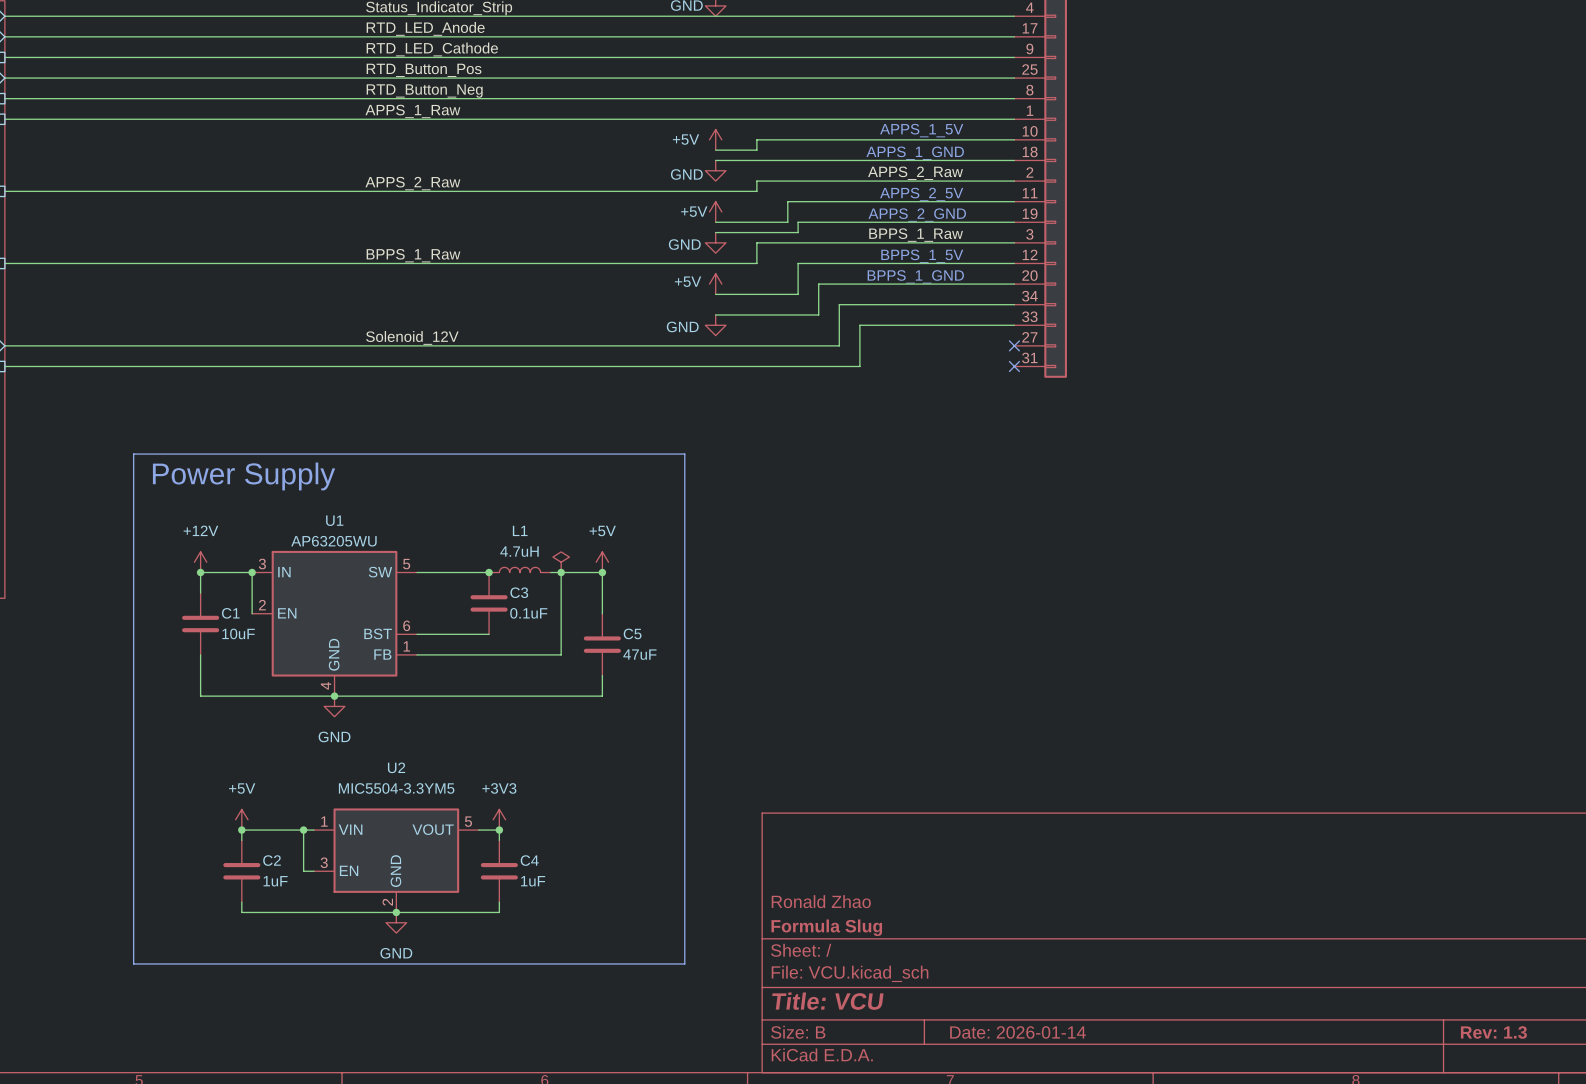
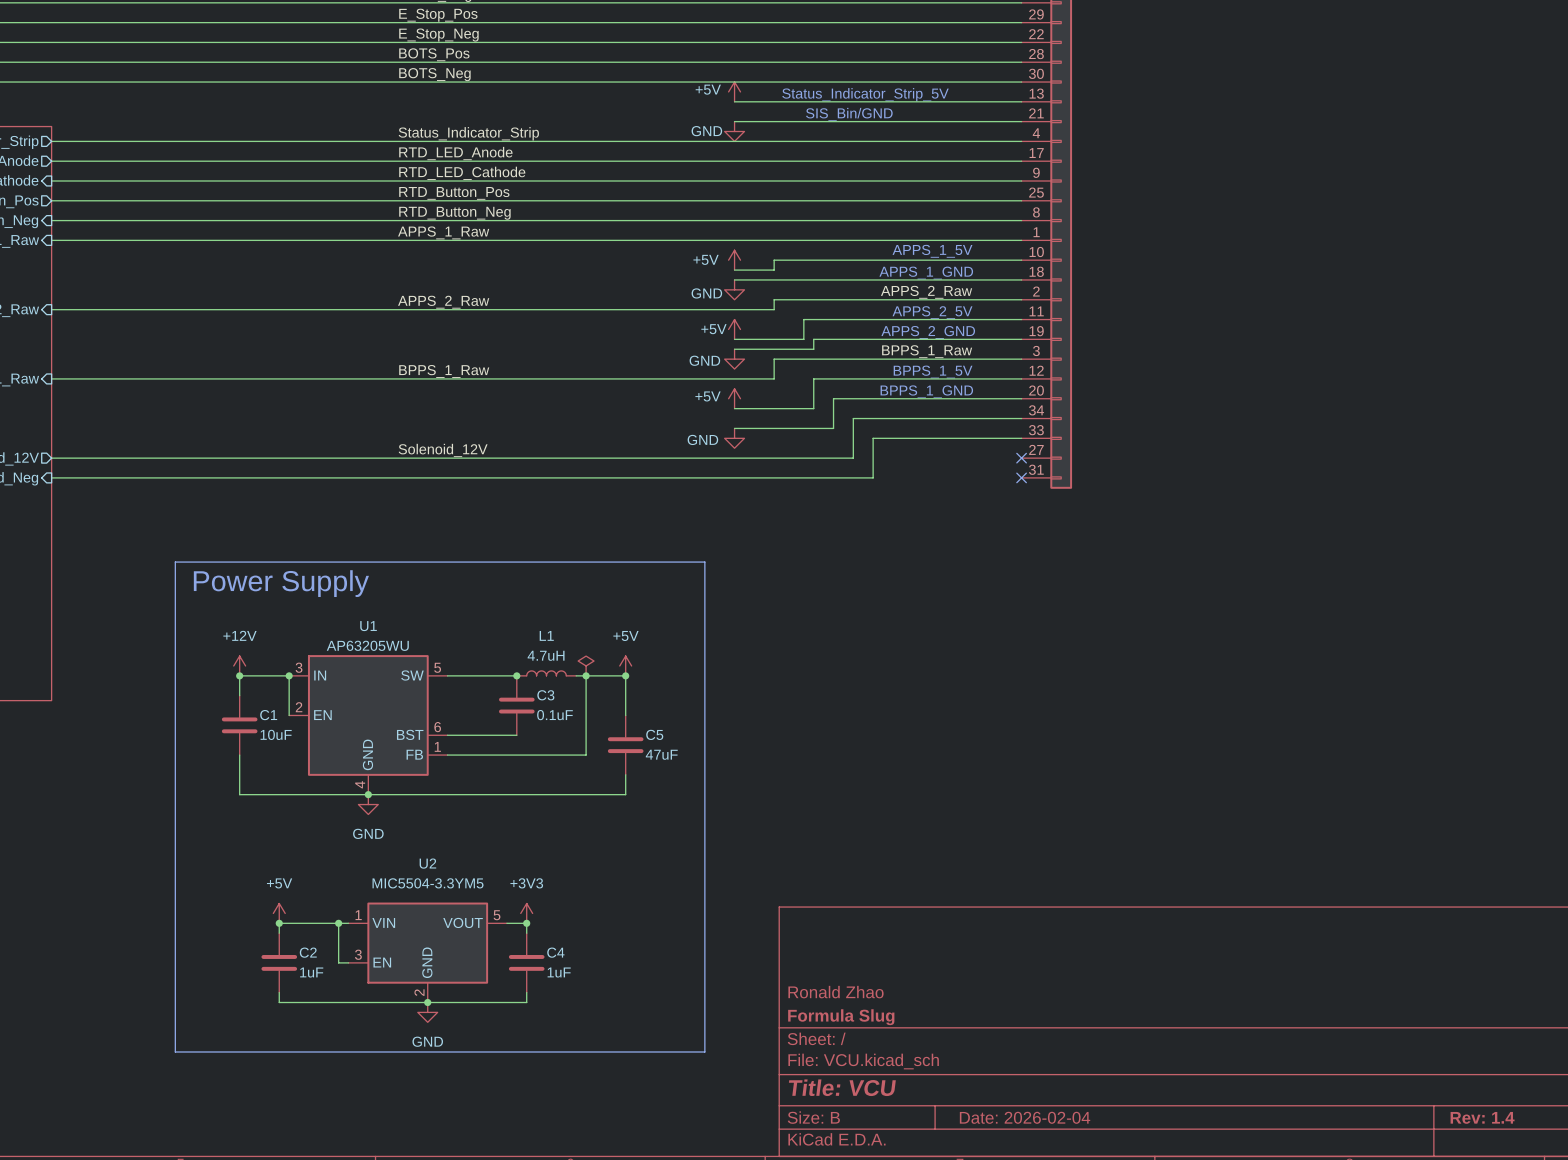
title block: Date: 2026-01-14 (1018, 1032) -> Date: 2026-02-04 (1025, 1117)
title block: Rev: 1.3 (1493, 1032) -> Rev: 1.4 (1482, 1117)

